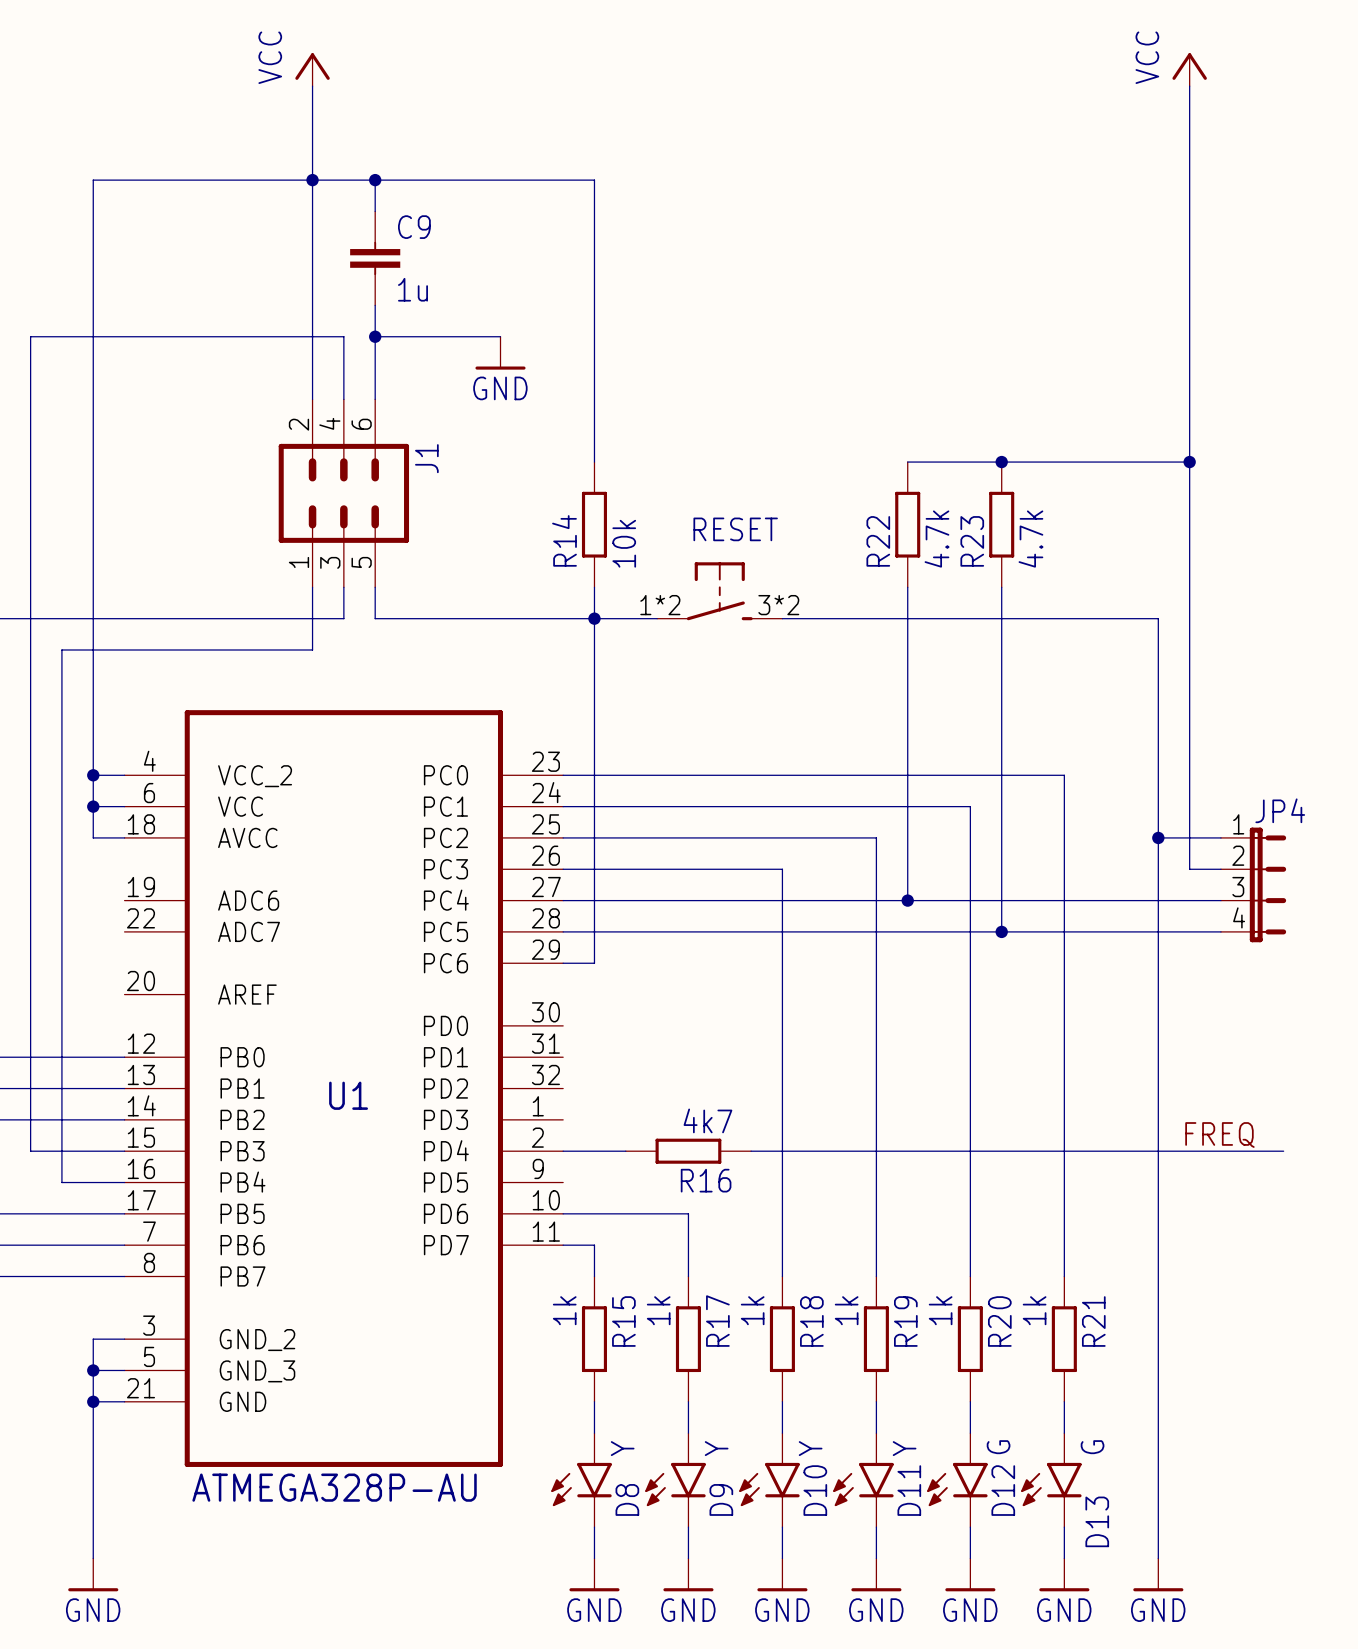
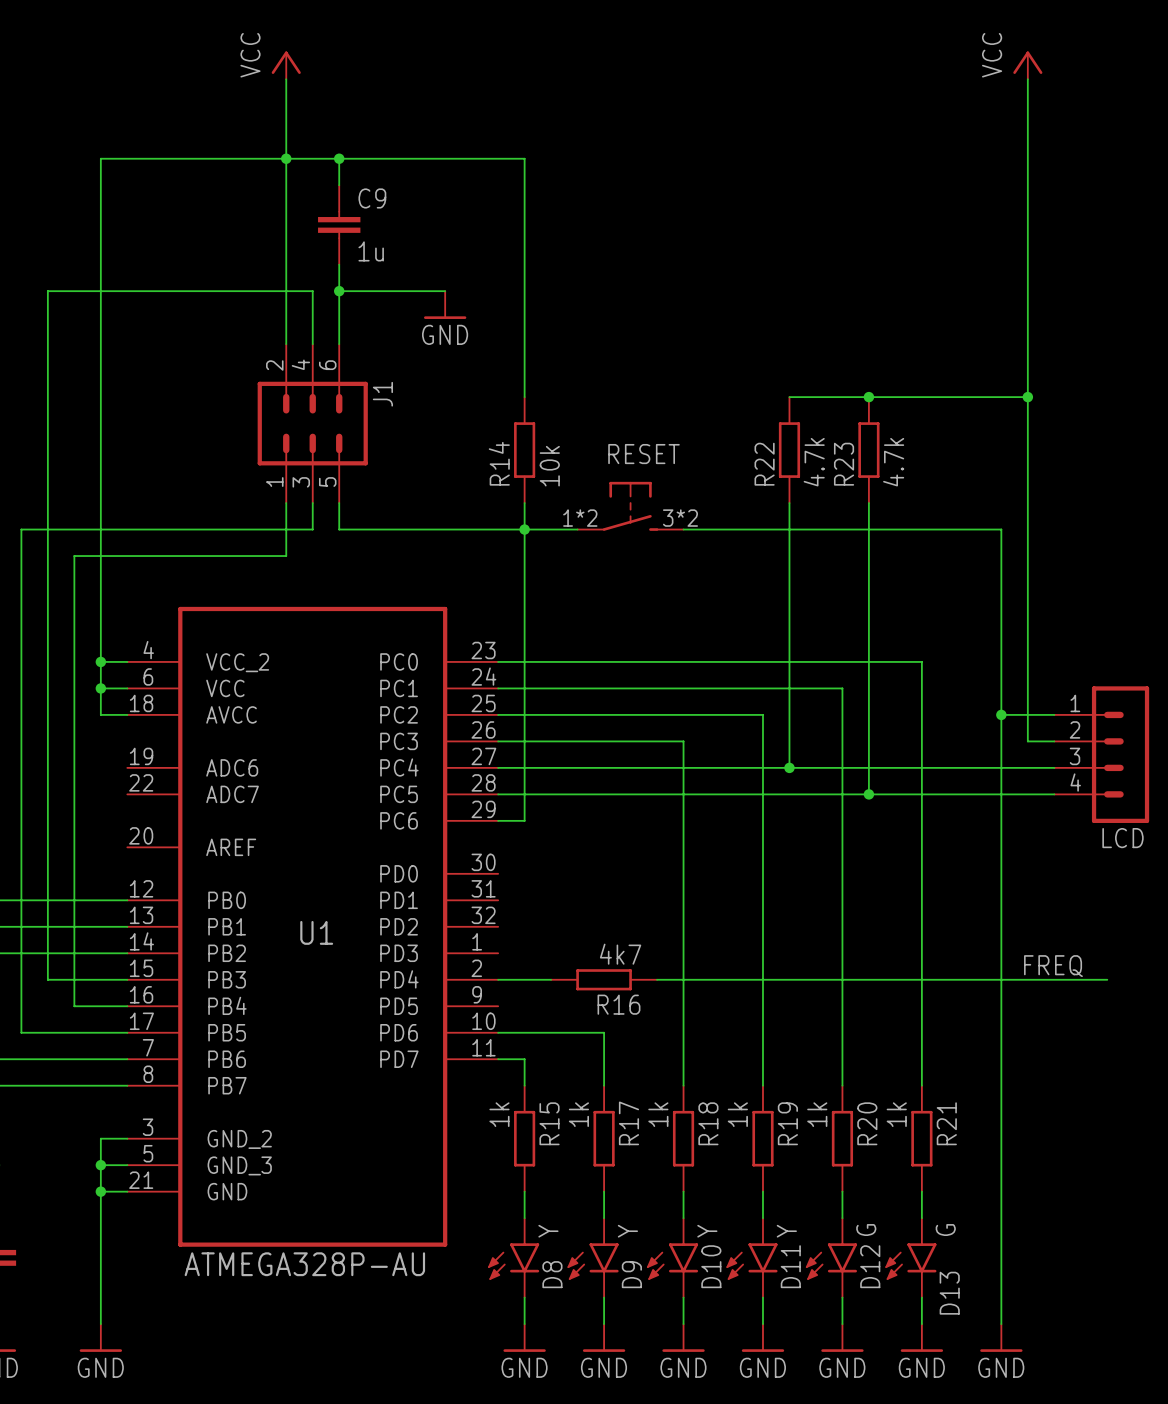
JP4: (1253, 884) -> none
LCD: none -> (1101, 754)

